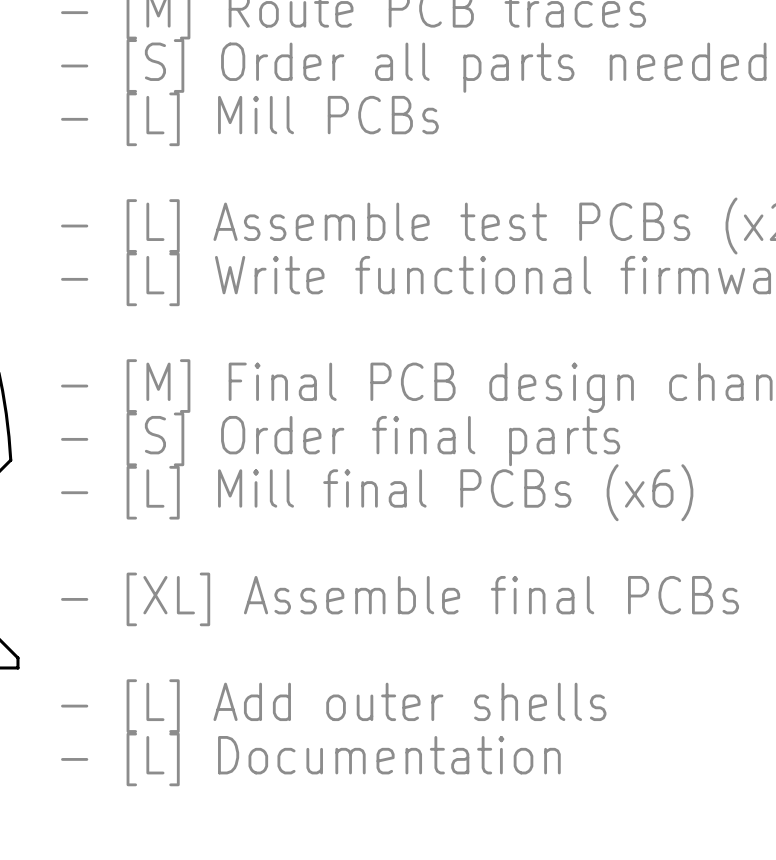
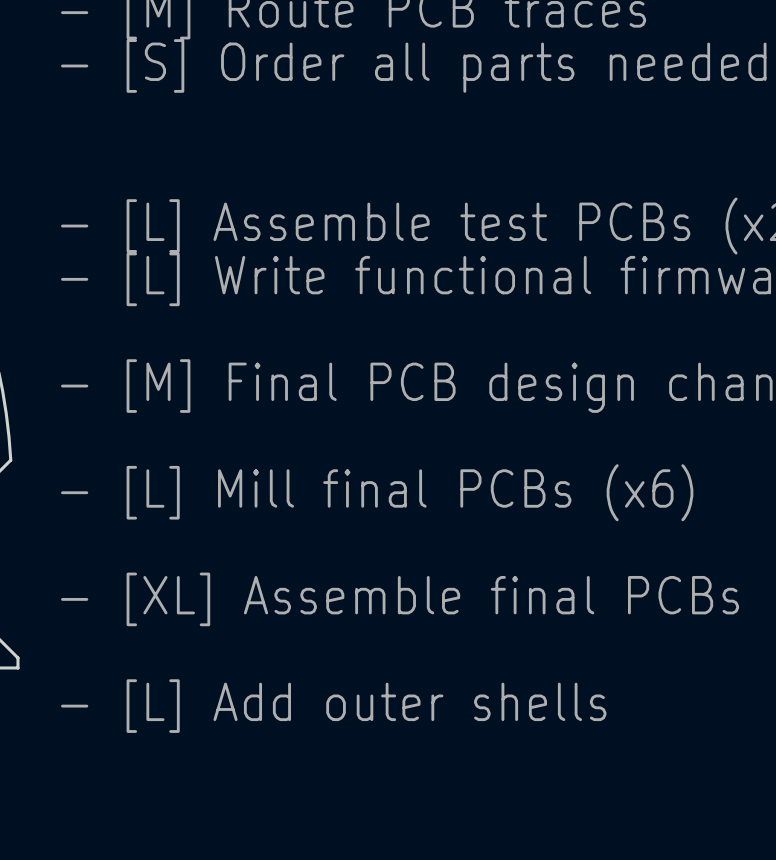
text: - [L] Mill PCBs (249, 119) -> none
text: - [S] Order final parts (340, 439) -> none
text: - [L] Documentation (310, 759) -> none

